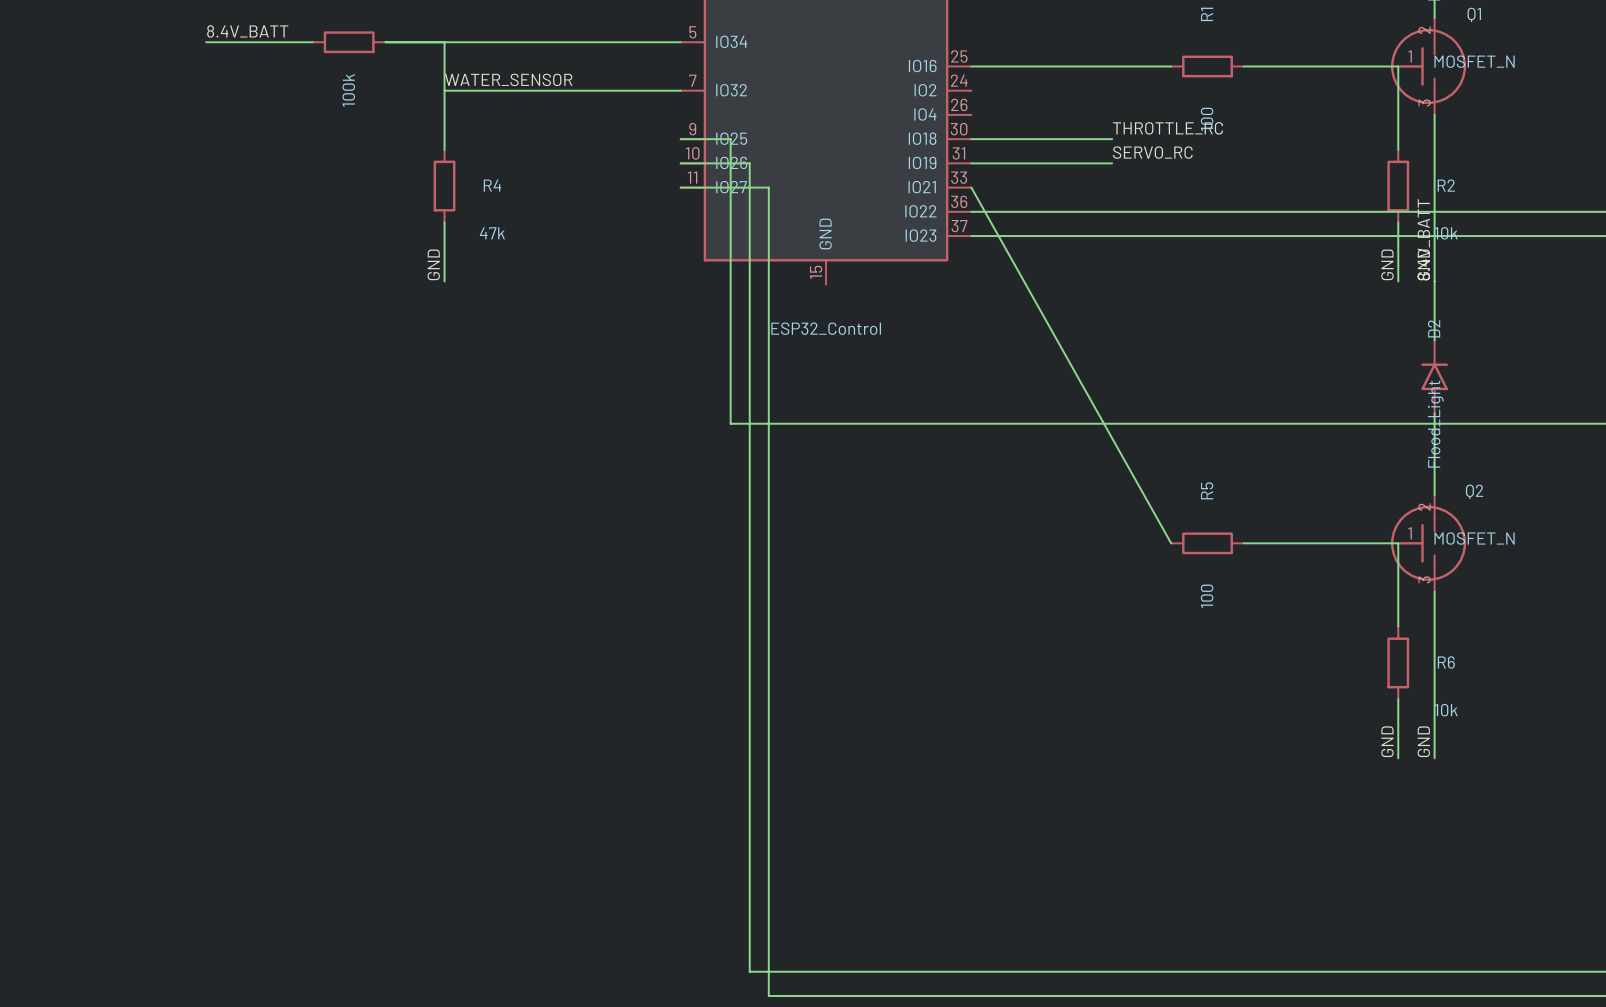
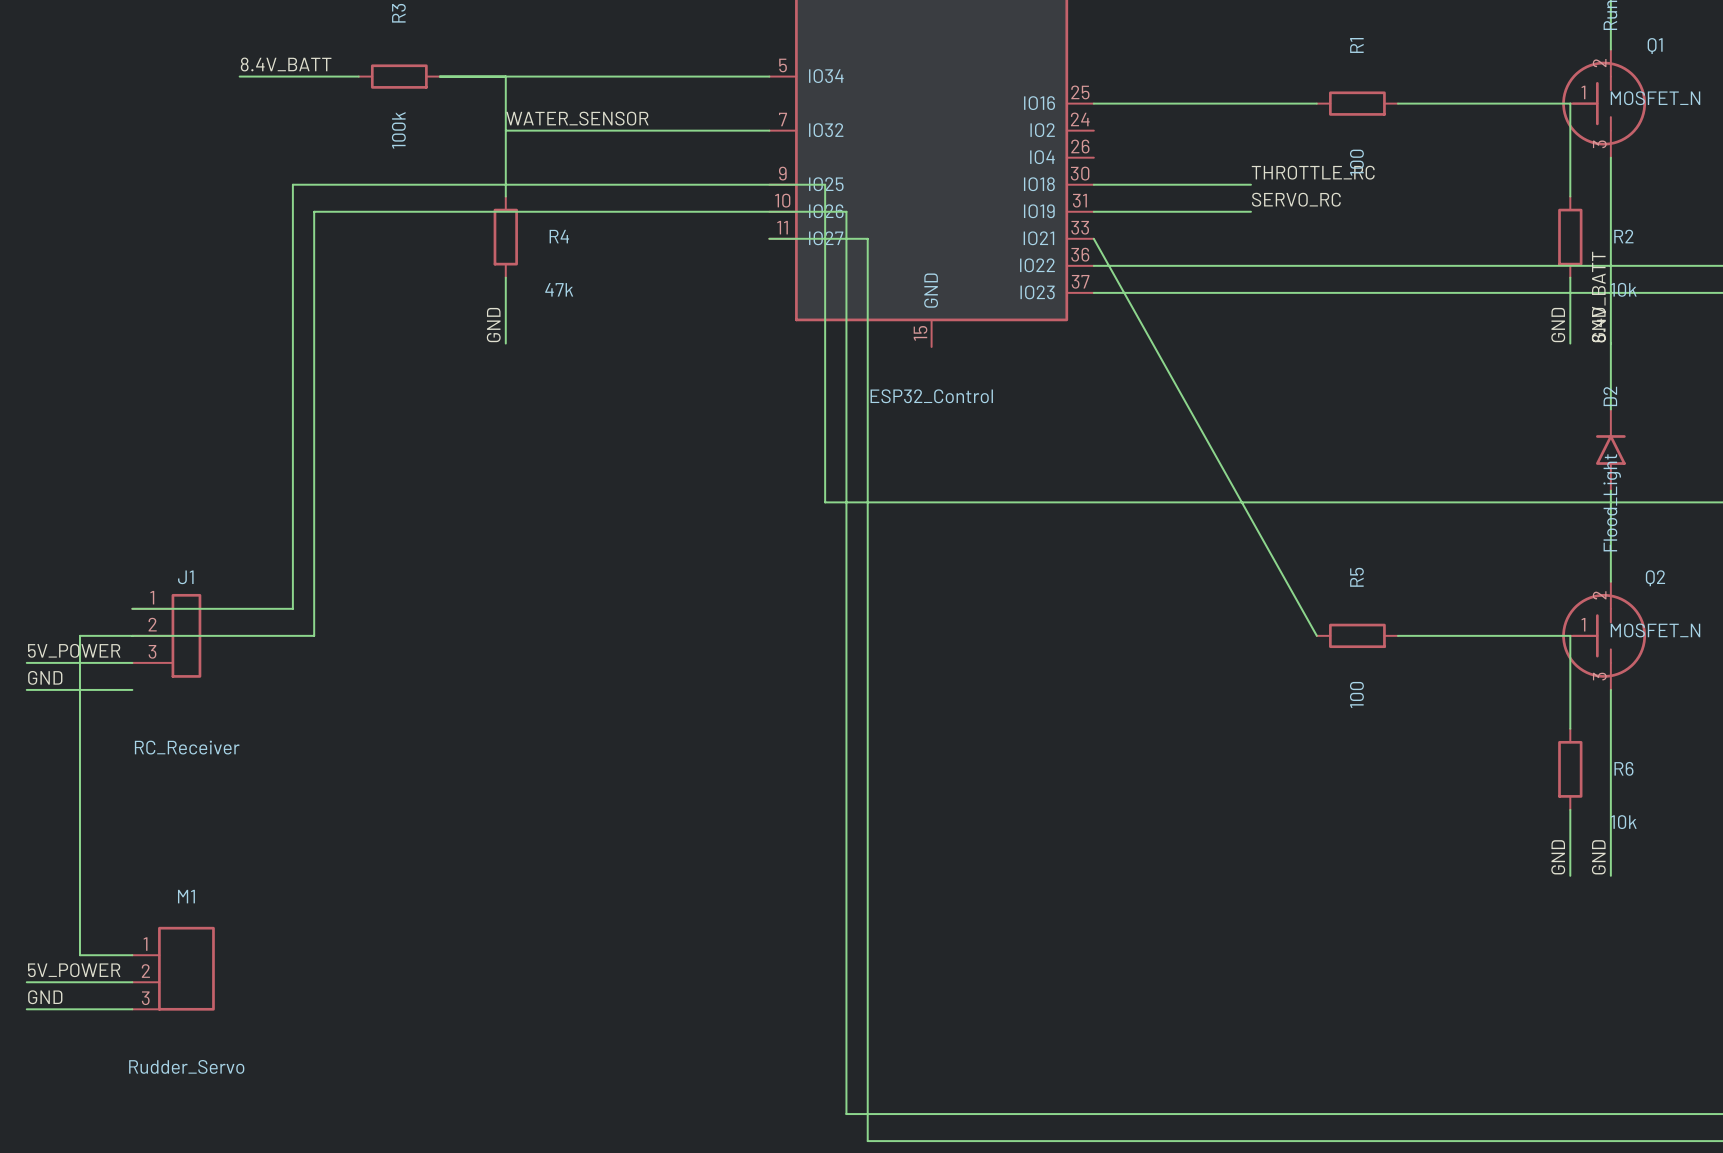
wire: none -> (769, 184) (292, 184) (292, 608) (132, 608)
wire: none -> (769, 211) (314, 211) (314, 635) (79, 635) (79, 955) (132, 955)
J1: none -> RC_Receiver (166, 635)
label: none -> 5V_POWER (74, 650)
wire: none -> (26, 662) (132, 662)
label: none -> GND (45, 677)
wire: none -> (26, 689) (132, 689)
M1: none -> Rudder_Servo (173, 968)
label: none -> 5V_POWER (74, 970)
wire: none -> (26, 982) (132, 982)
label: none -> GND (45, 997)
wire: none -> (26, 1009) (132, 1009)

